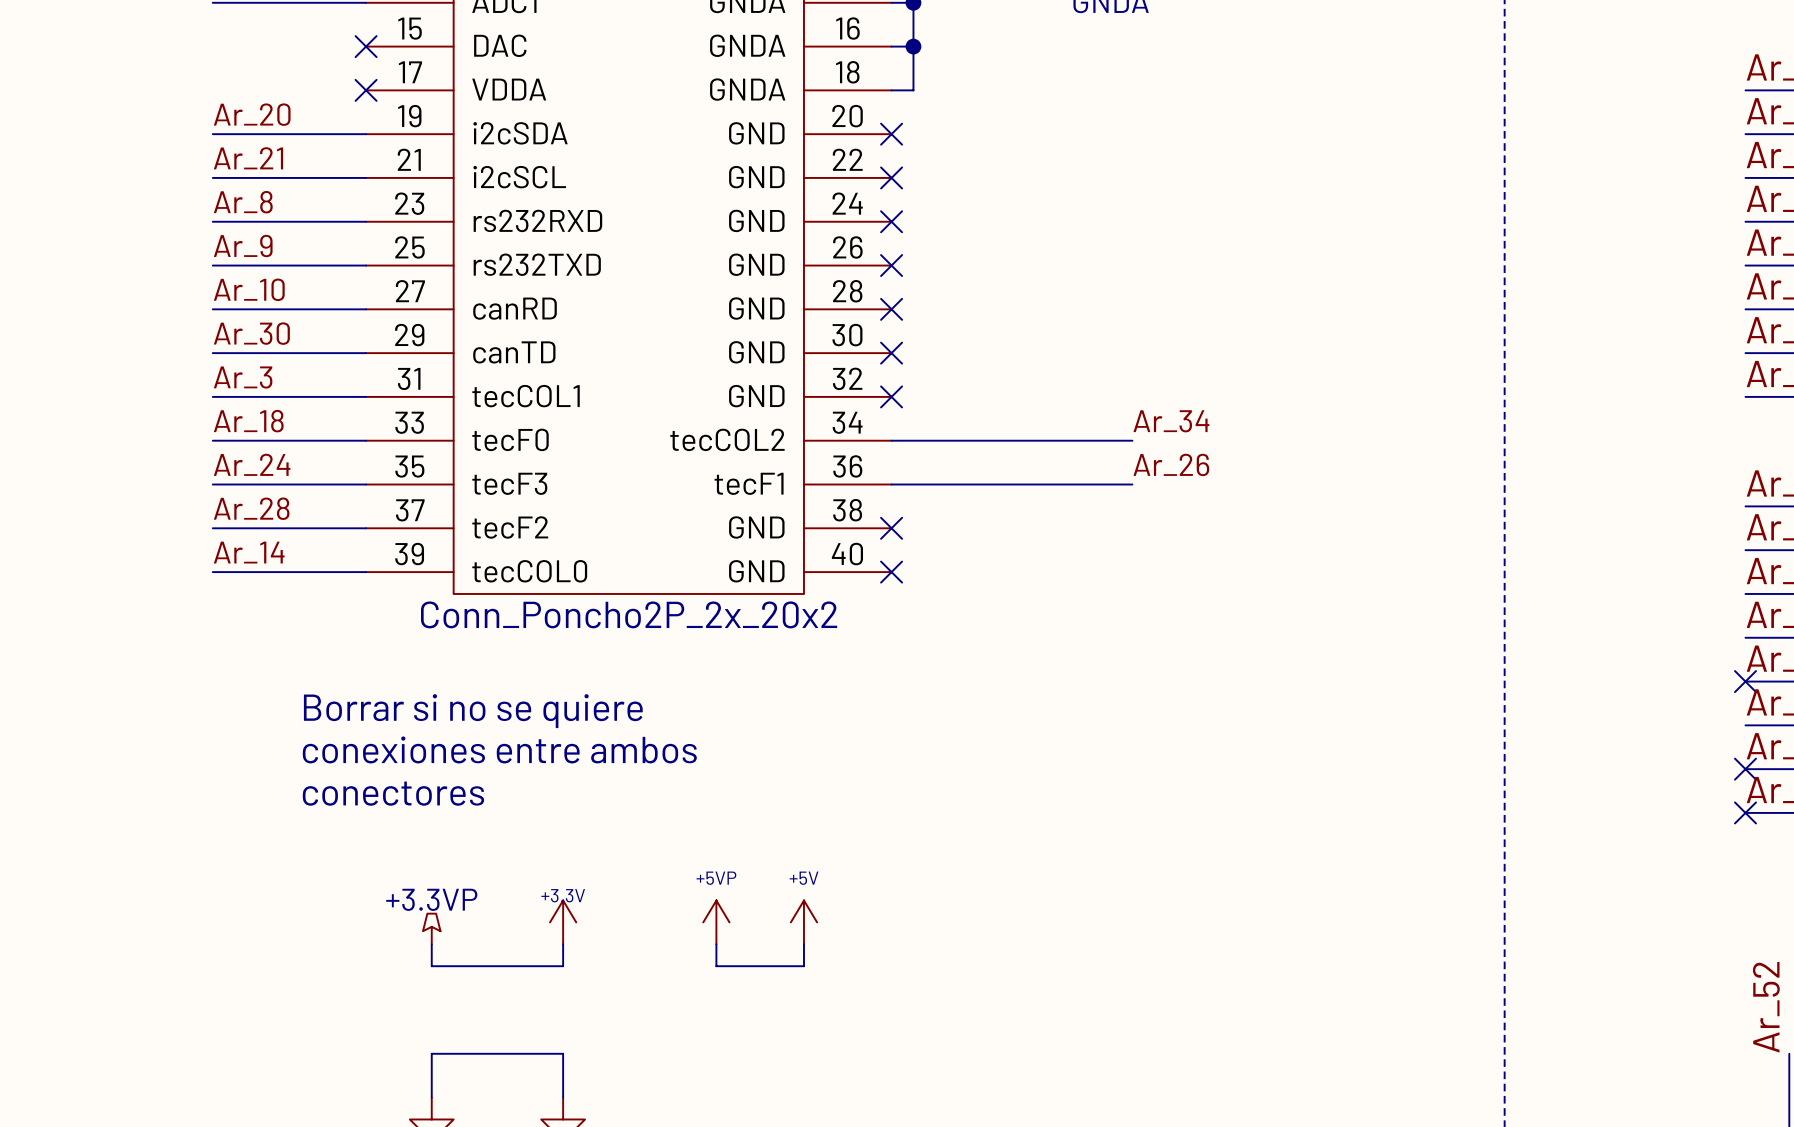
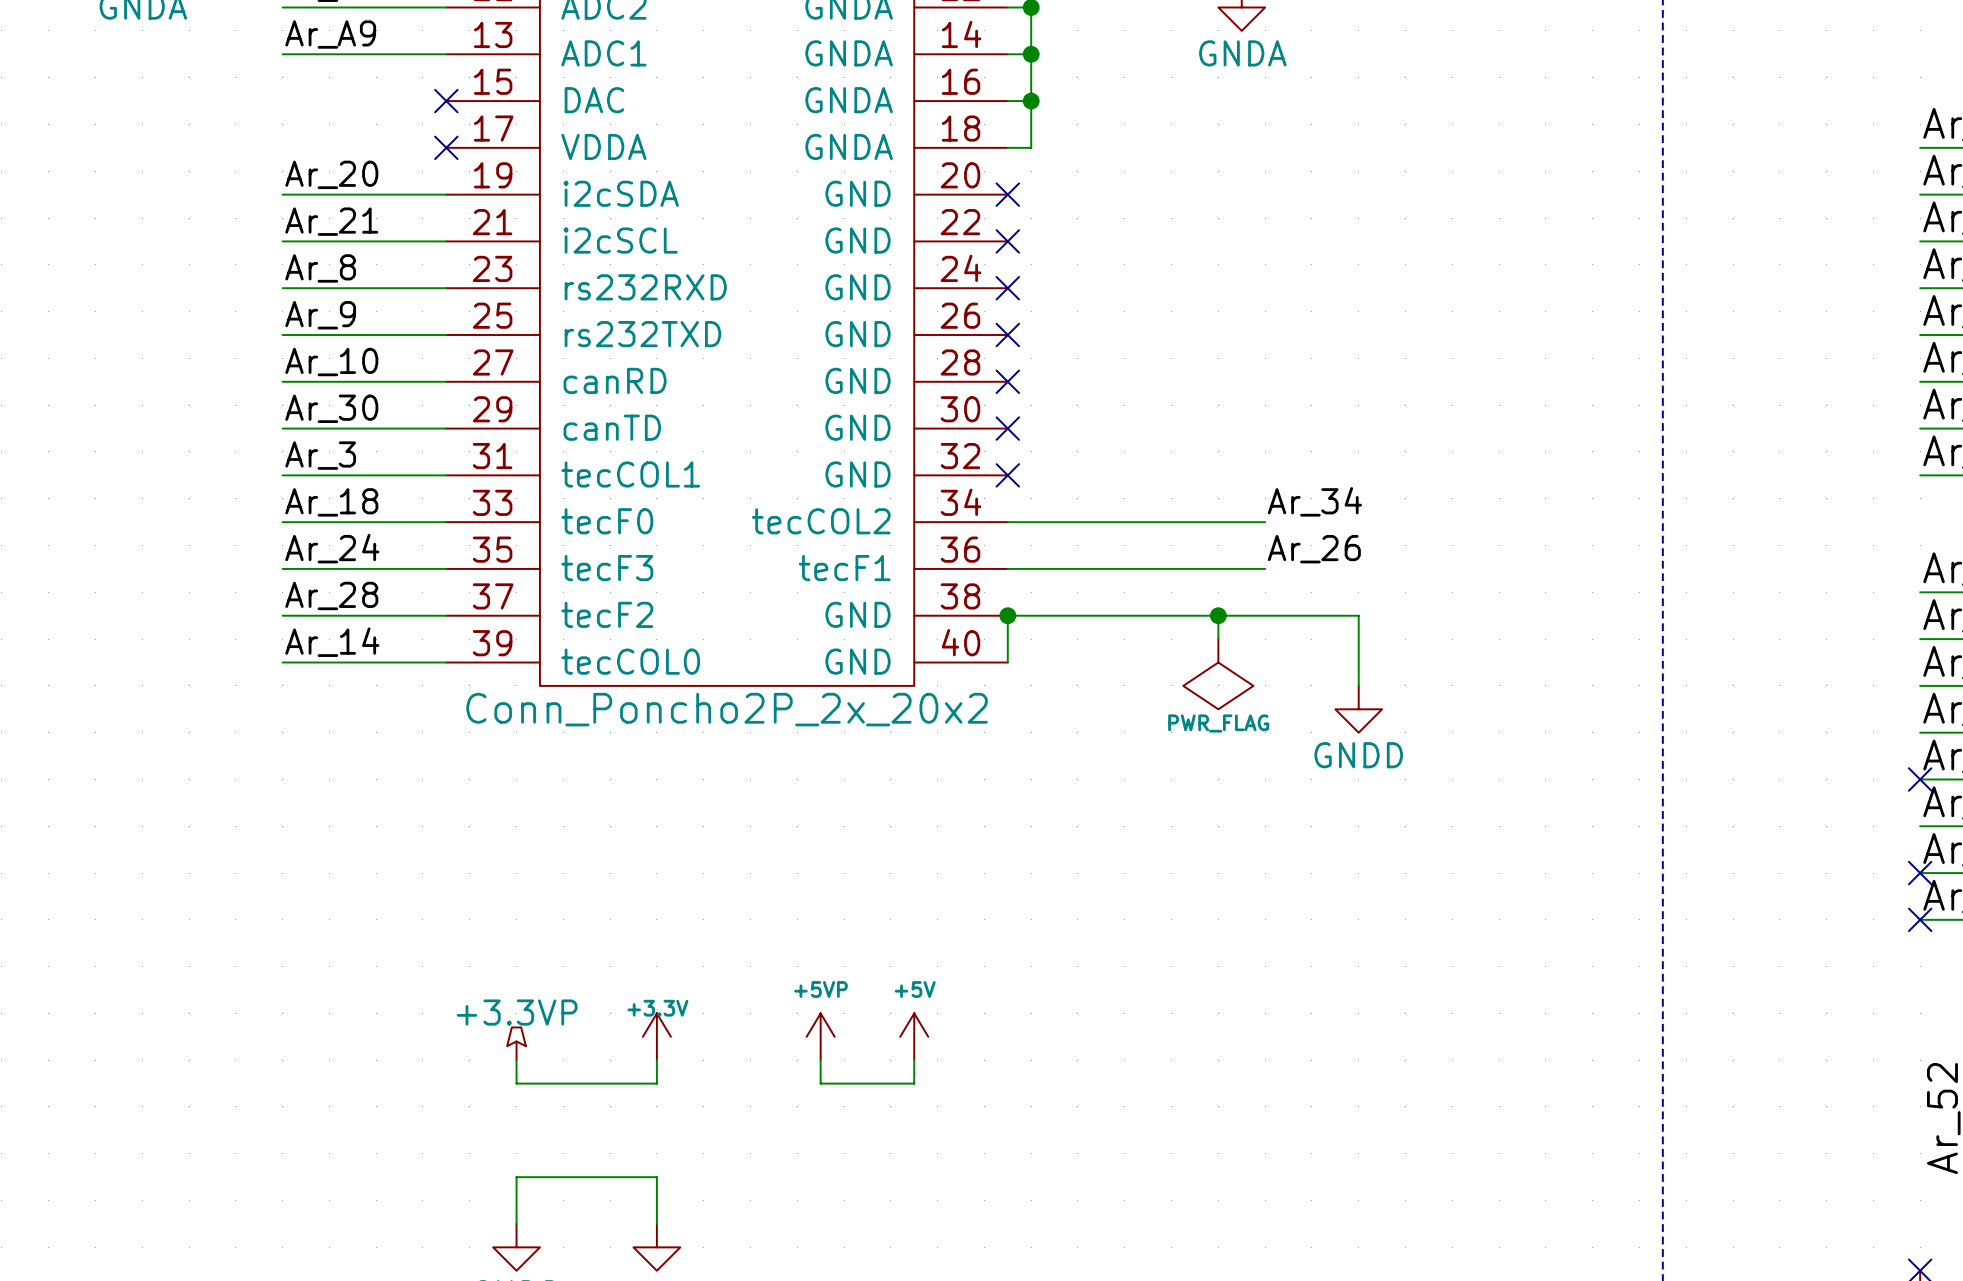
no-connect mark: (891, 528) -> none
junction: none -> (1007, 615)
wire: none -> (1218, 615) (1218, 639)
junction: none -> (1218, 615)
wire: none -> (1007, 662) (1007, 615) (1358, 615) (1358, 685)
no-connect mark: (891, 572) -> none
power symbol: none -> PWR_FLAG (1218, 674)
power symbol: none -> GNDD (1358, 709)
text: Borrar si no se quiere (473, 711) -> none
text: conexiones entre ambos (499, 749) -> none
text: conectores (393, 793) -> none

